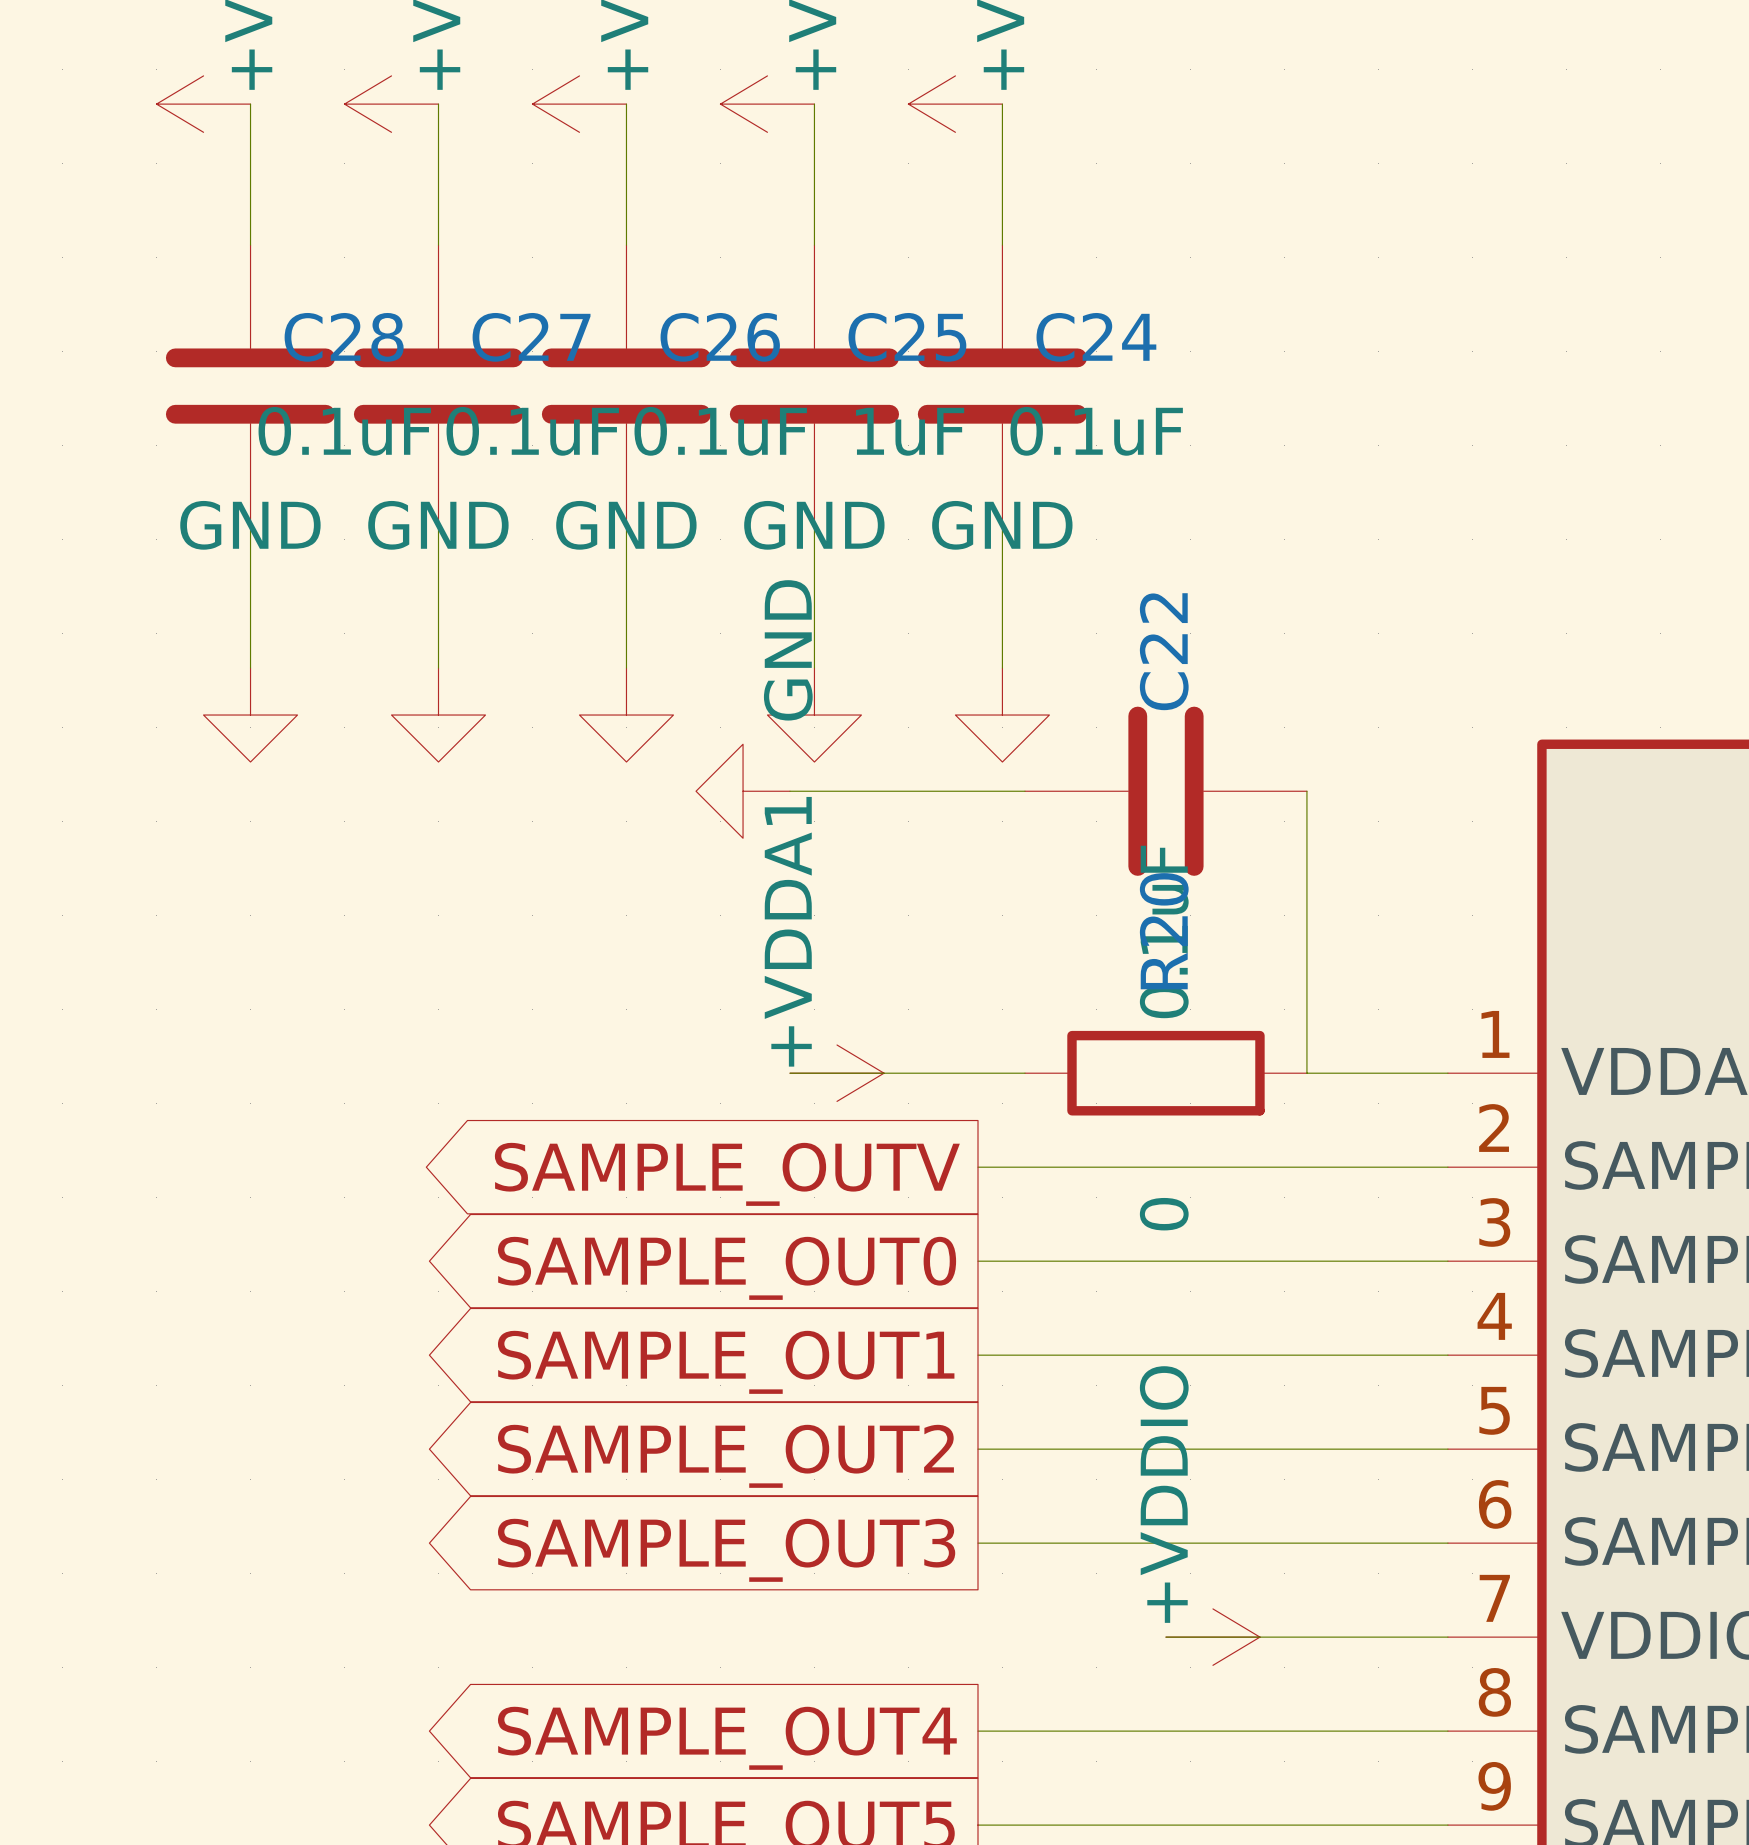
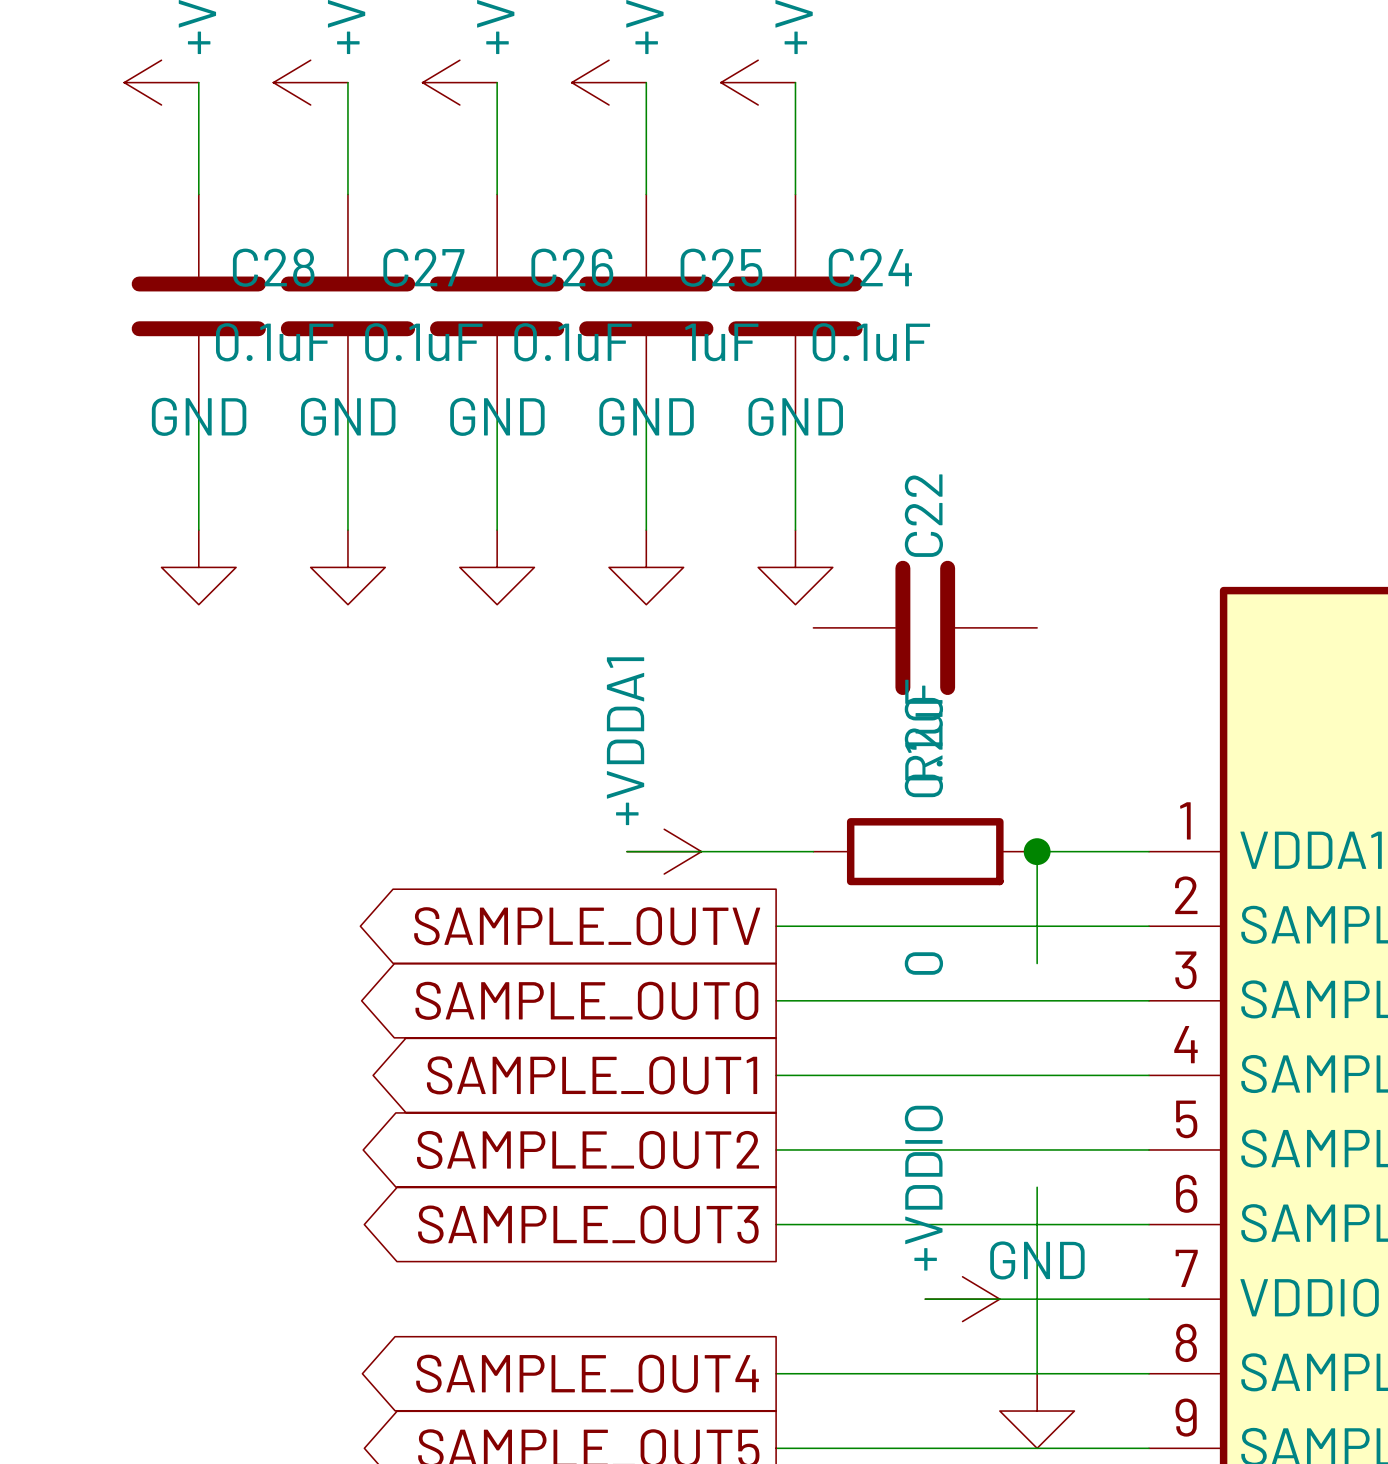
power symbol: GND (743, 791) -> none
wire: (790, 791) (1024, 791) -> none
wire: (1306, 791) (1306, 1073) -> (1037, 963) (1037, 851)
junction: none -> (1037, 851)
wire: none -> (1037, 1187) (1037, 1373)
power symbol: none -> GND (1037, 1411)

